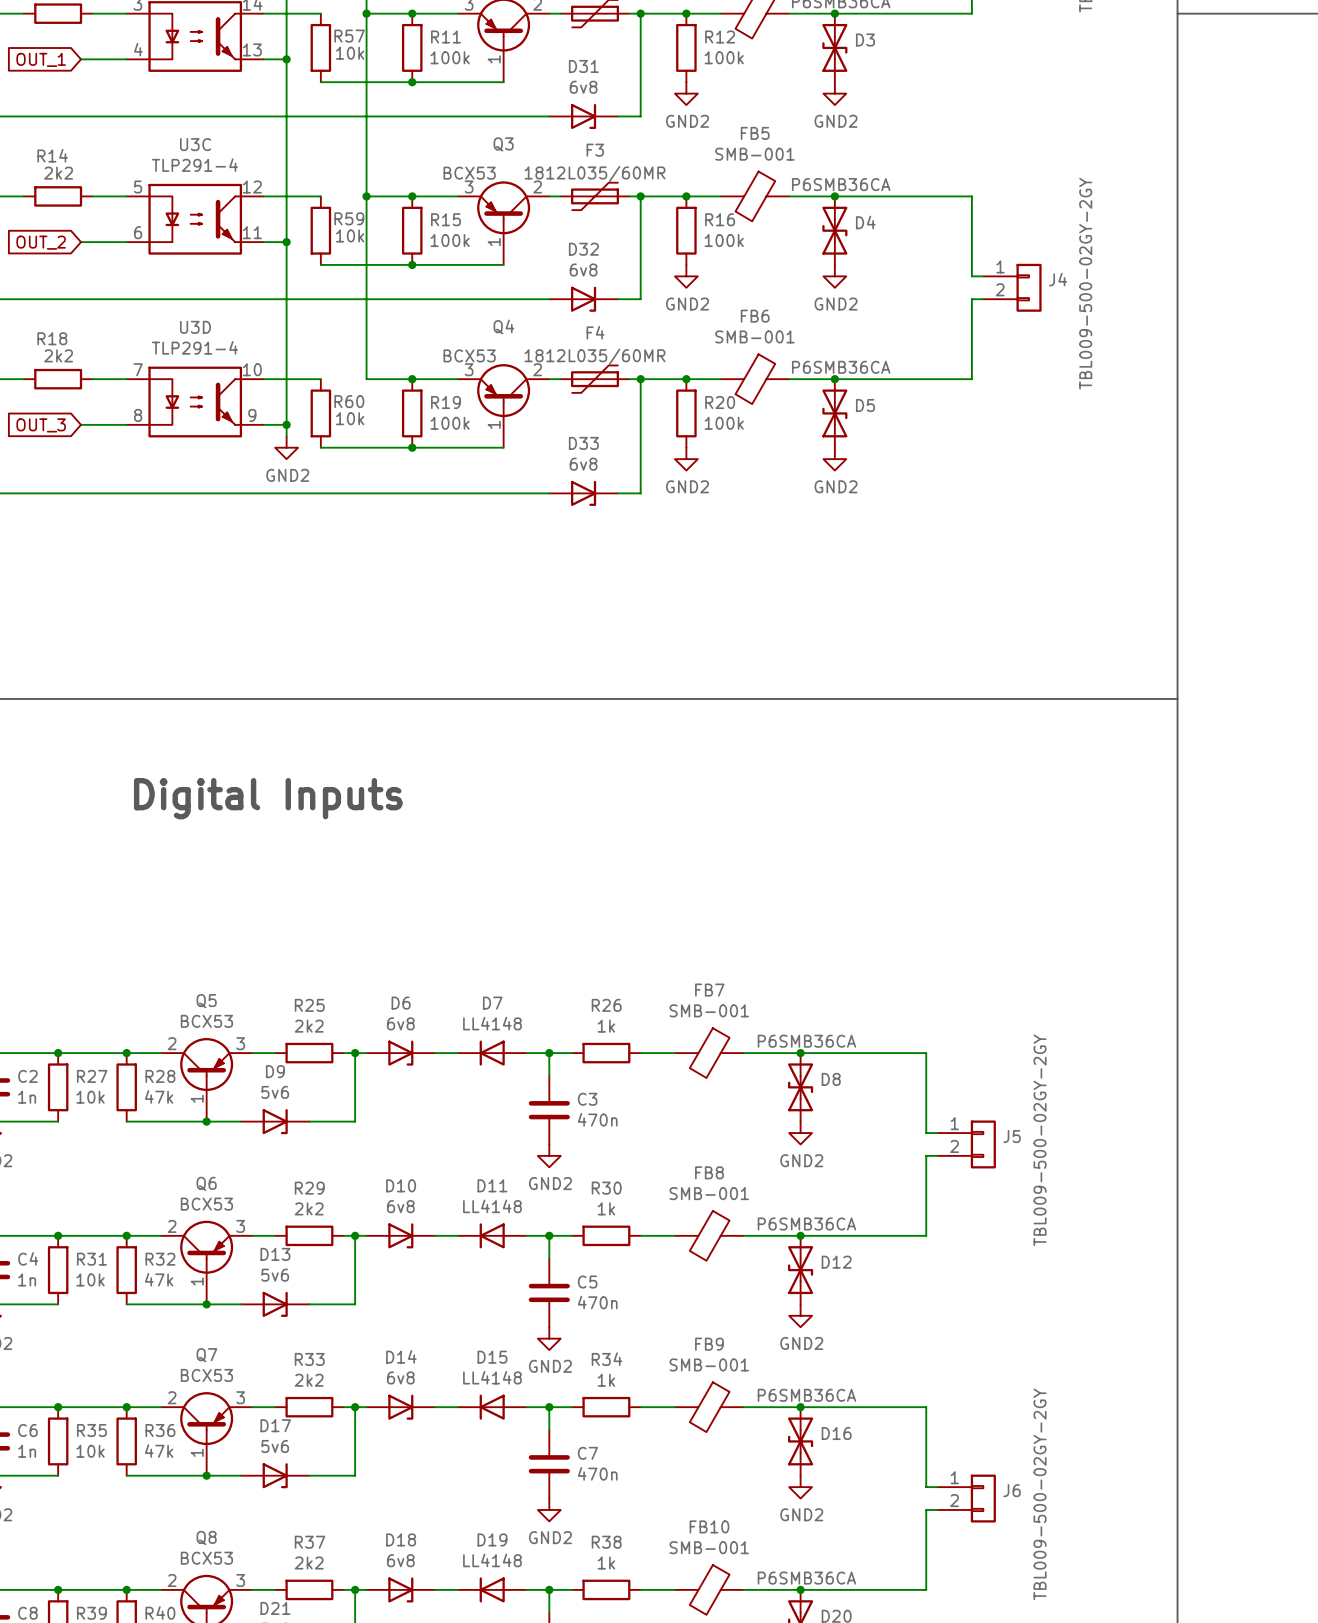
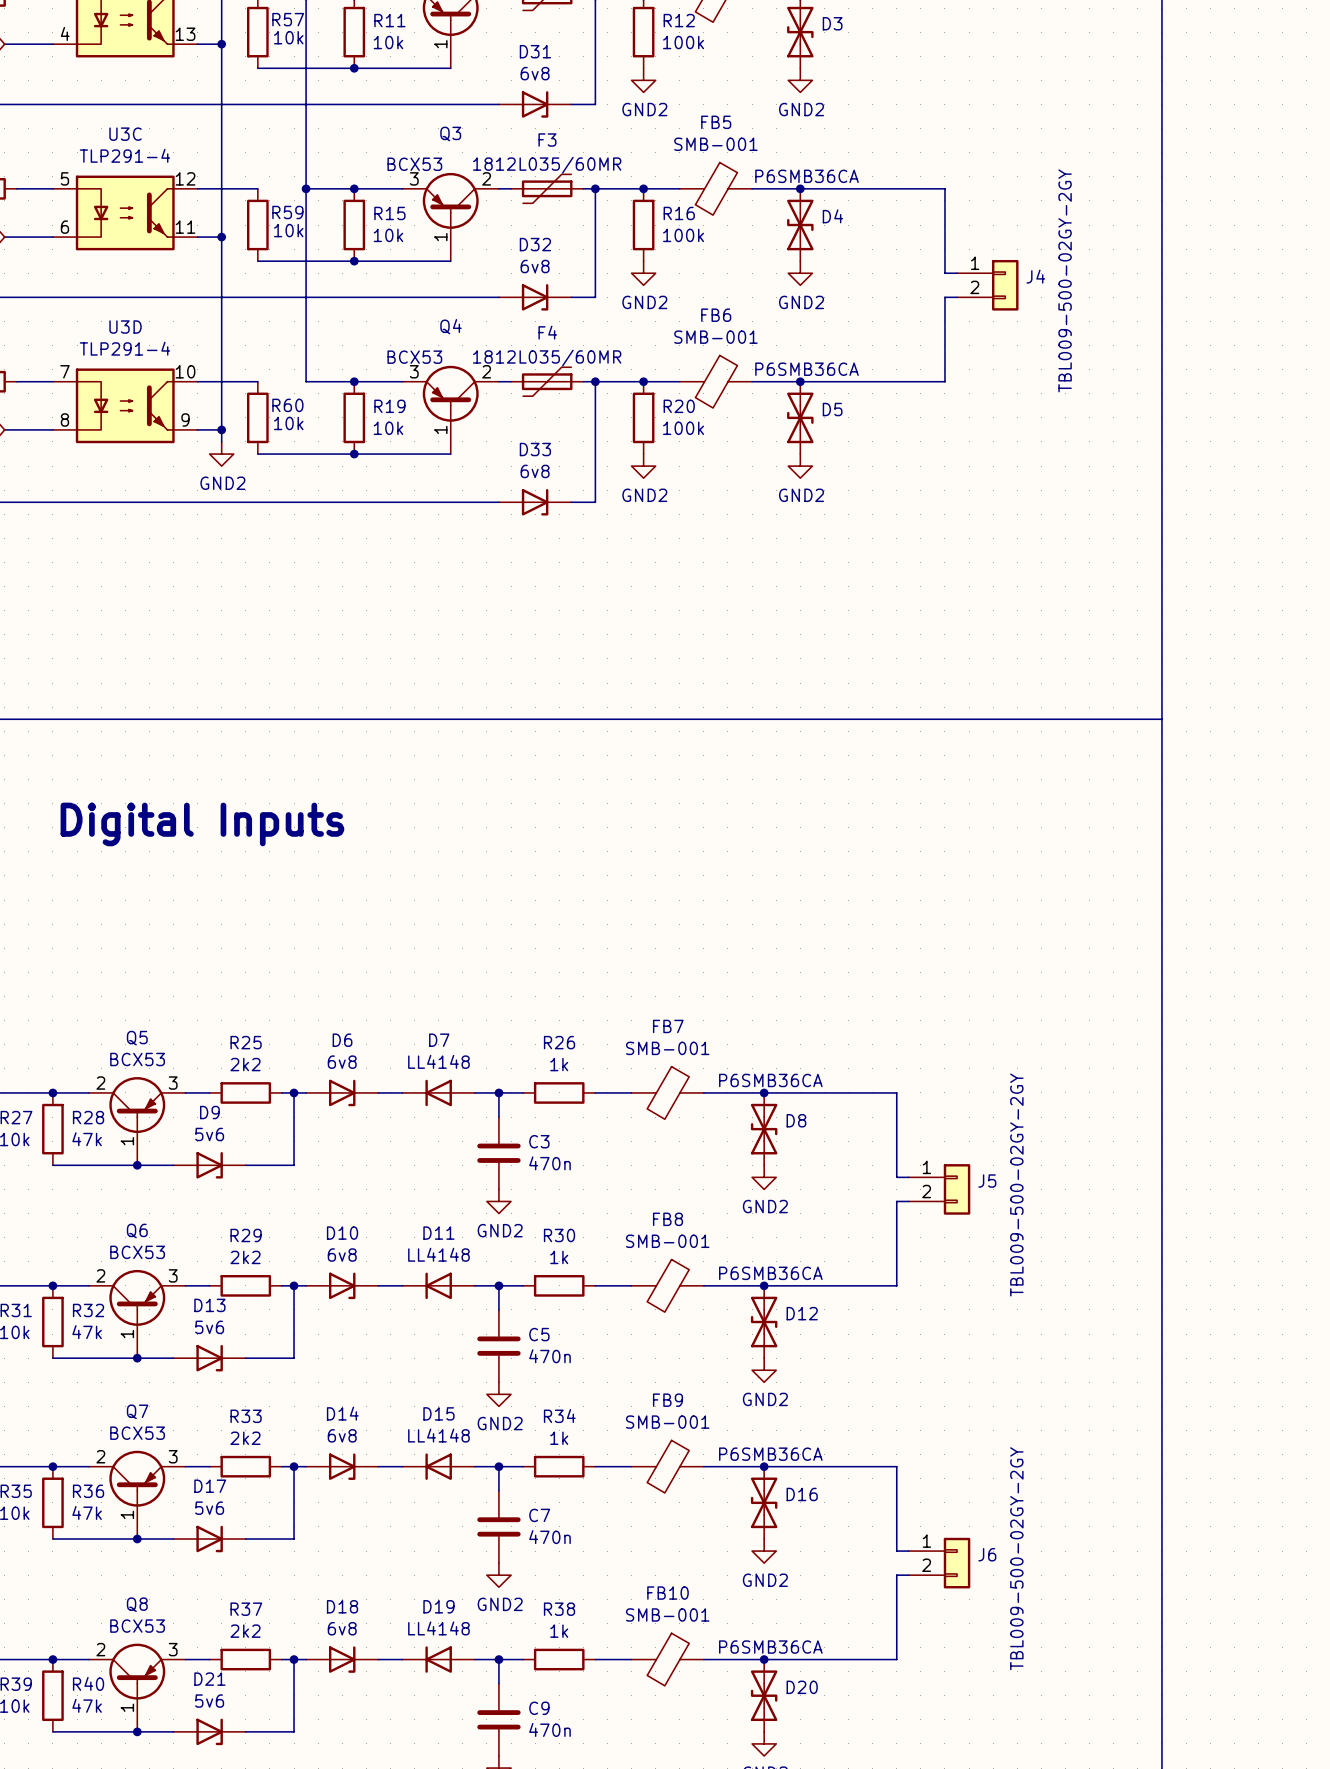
R11 value: 100k (450, 57) -> 10k (388, 42)
R15 value: 100k (450, 240) -> 10k (388, 235)
R19 value: 100k (450, 423) -> 10k (388, 428)

